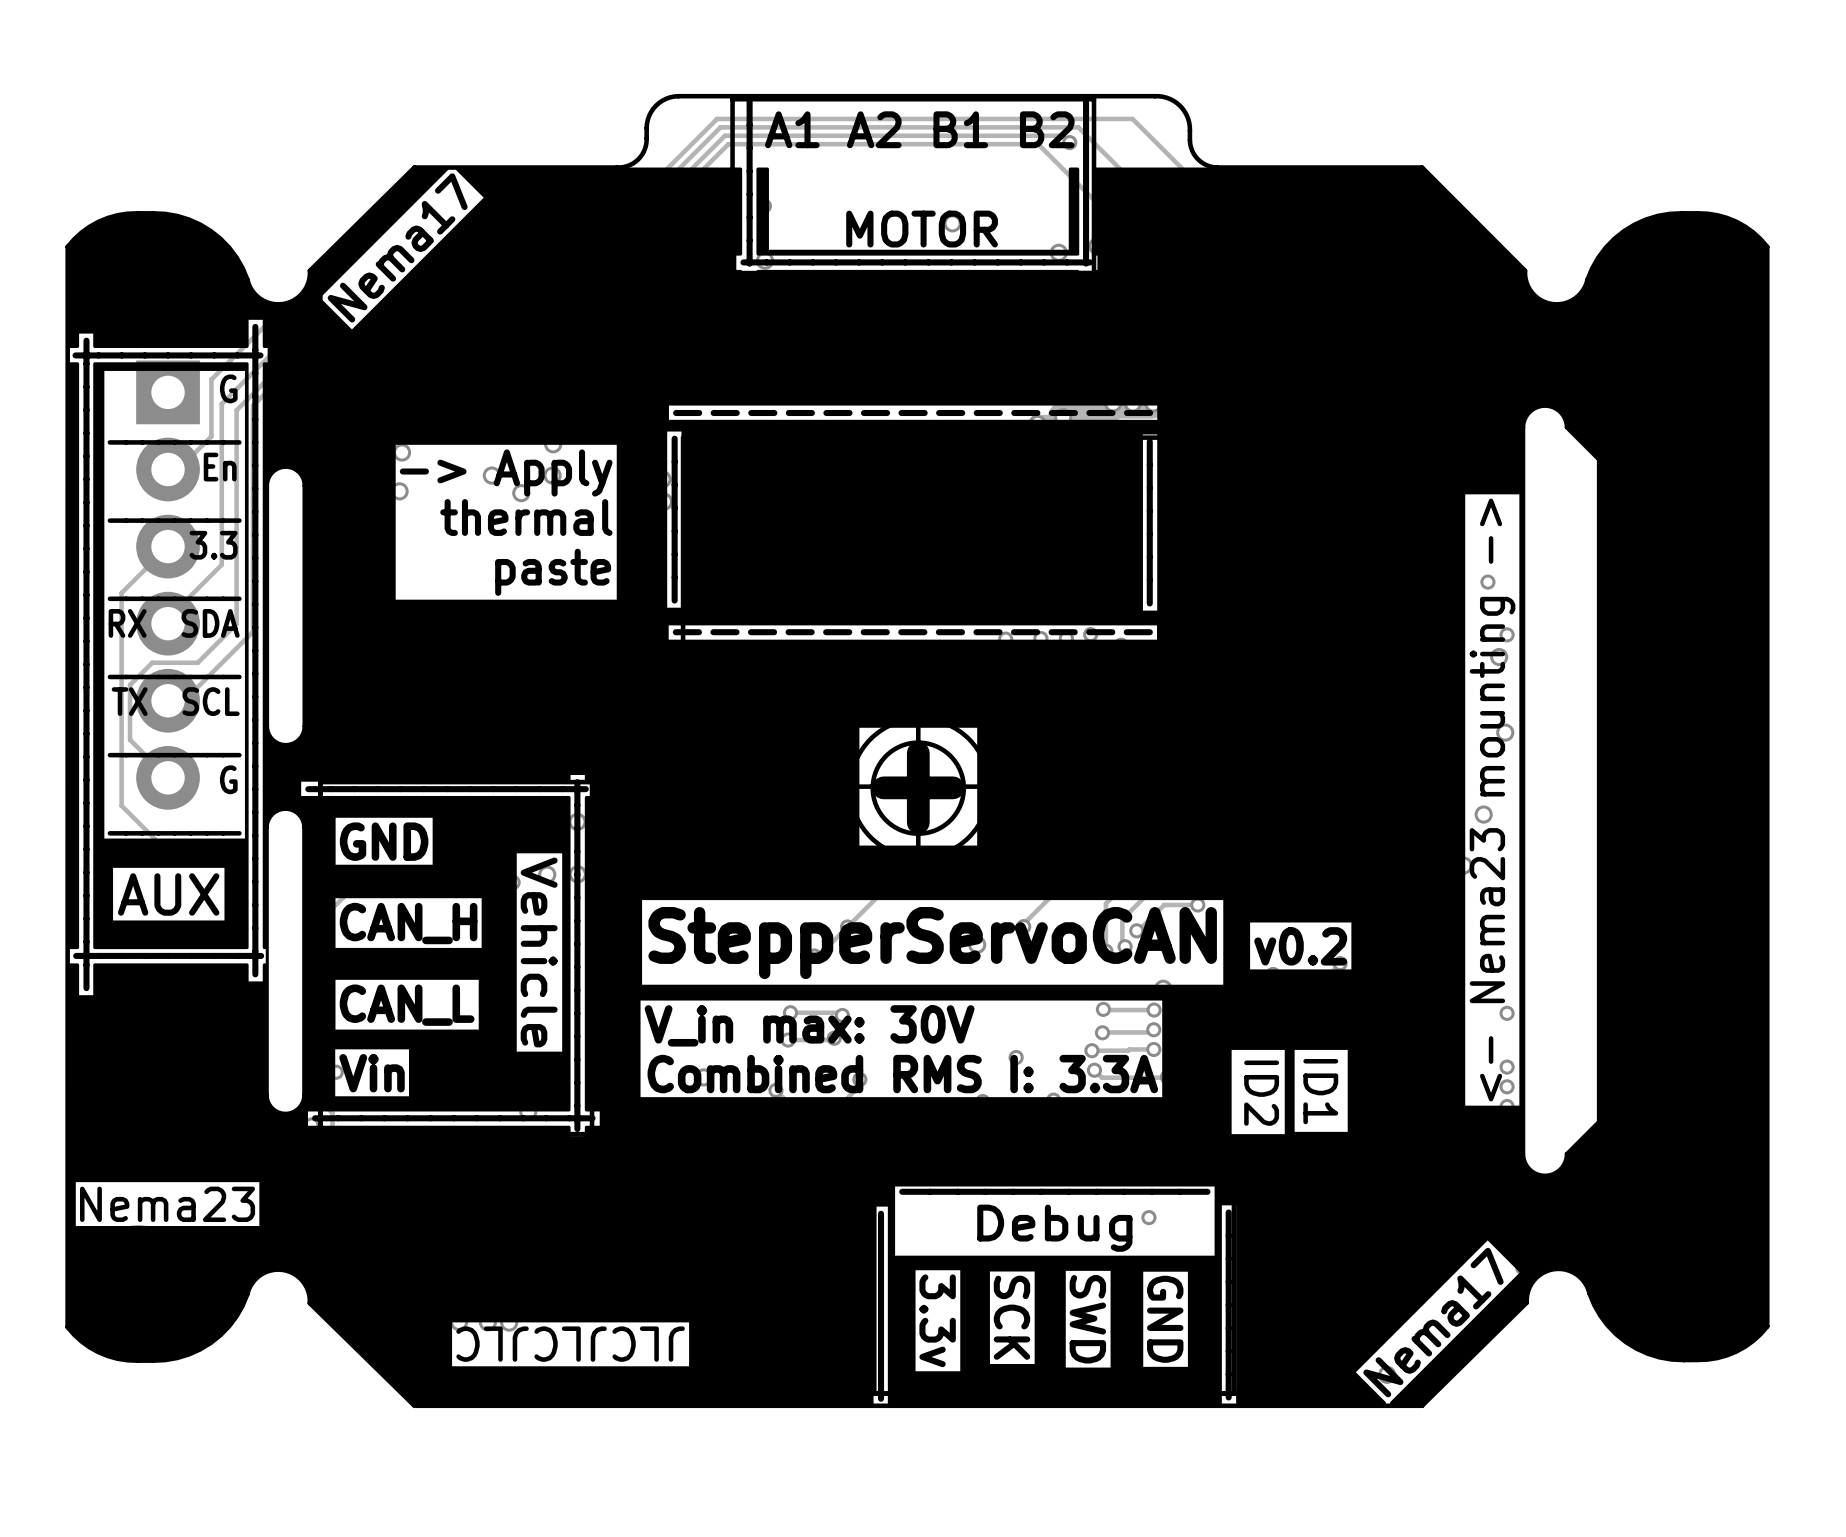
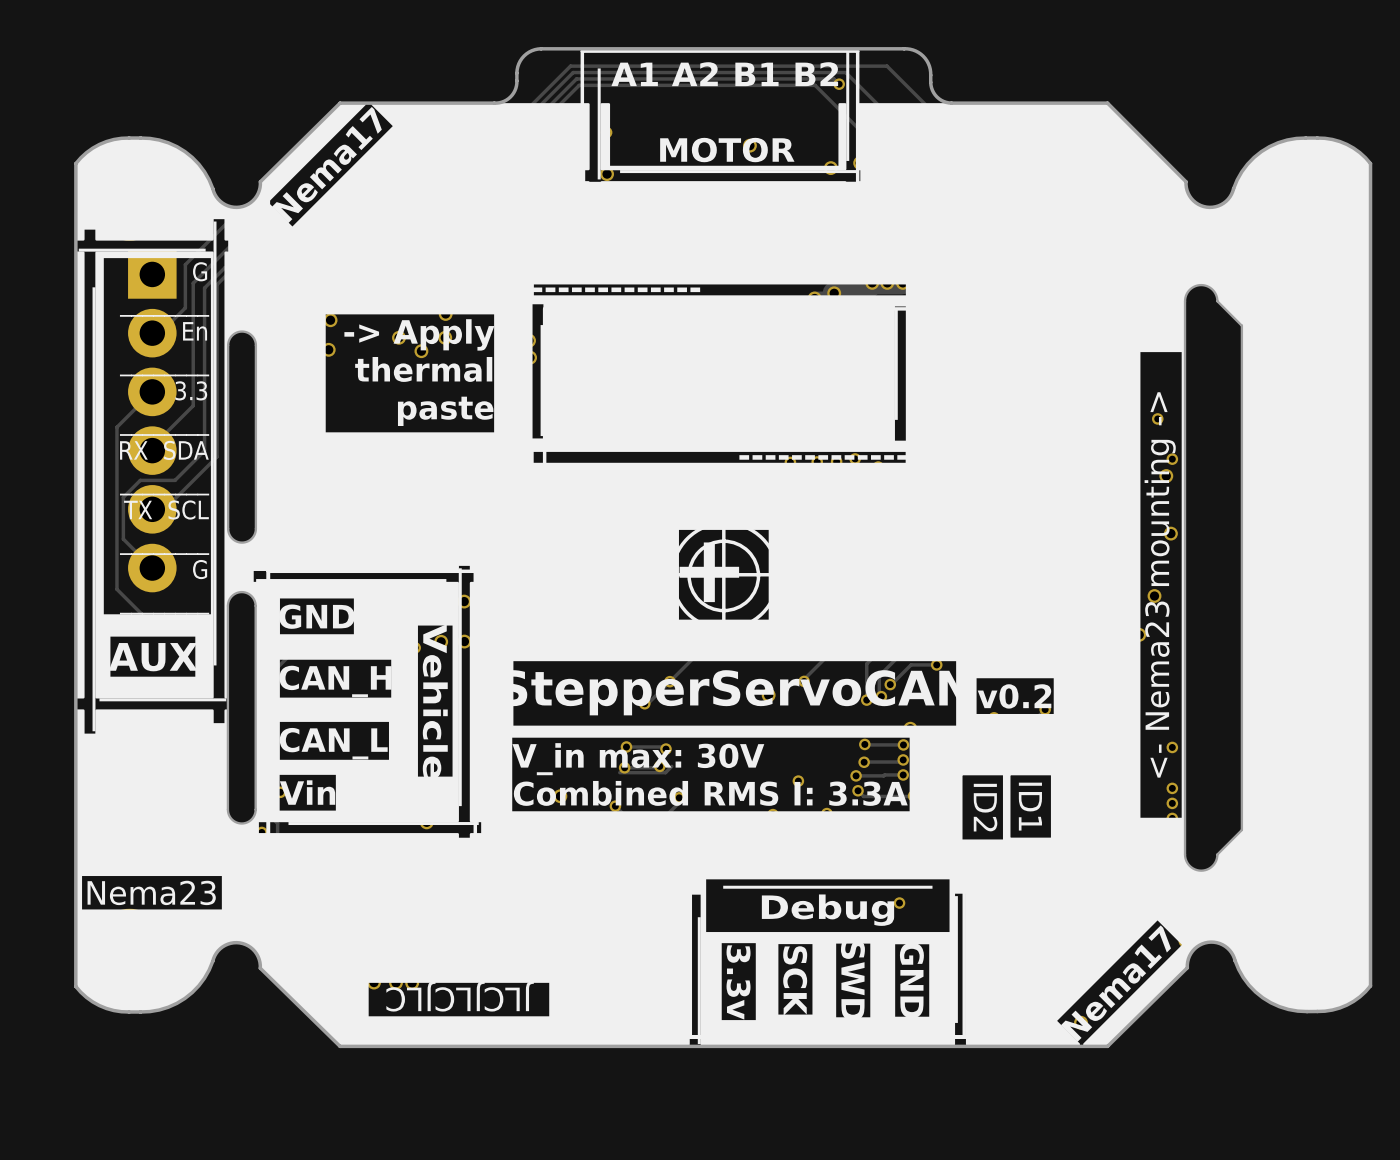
track: none -> (671, 766) (665, 772) (619, 772)

